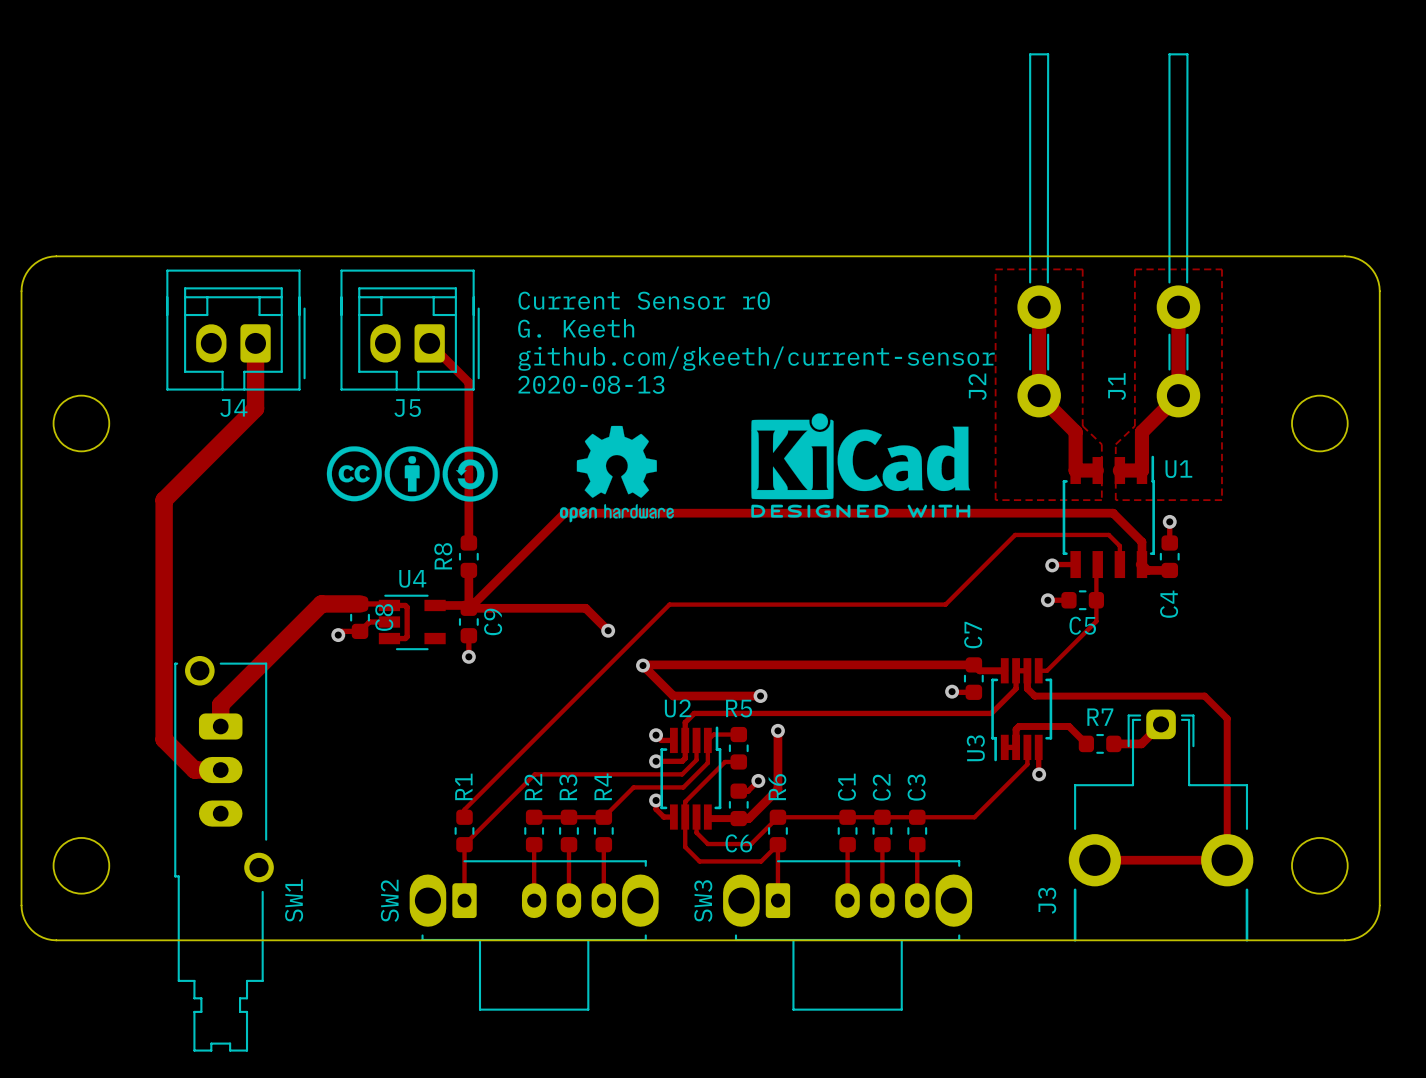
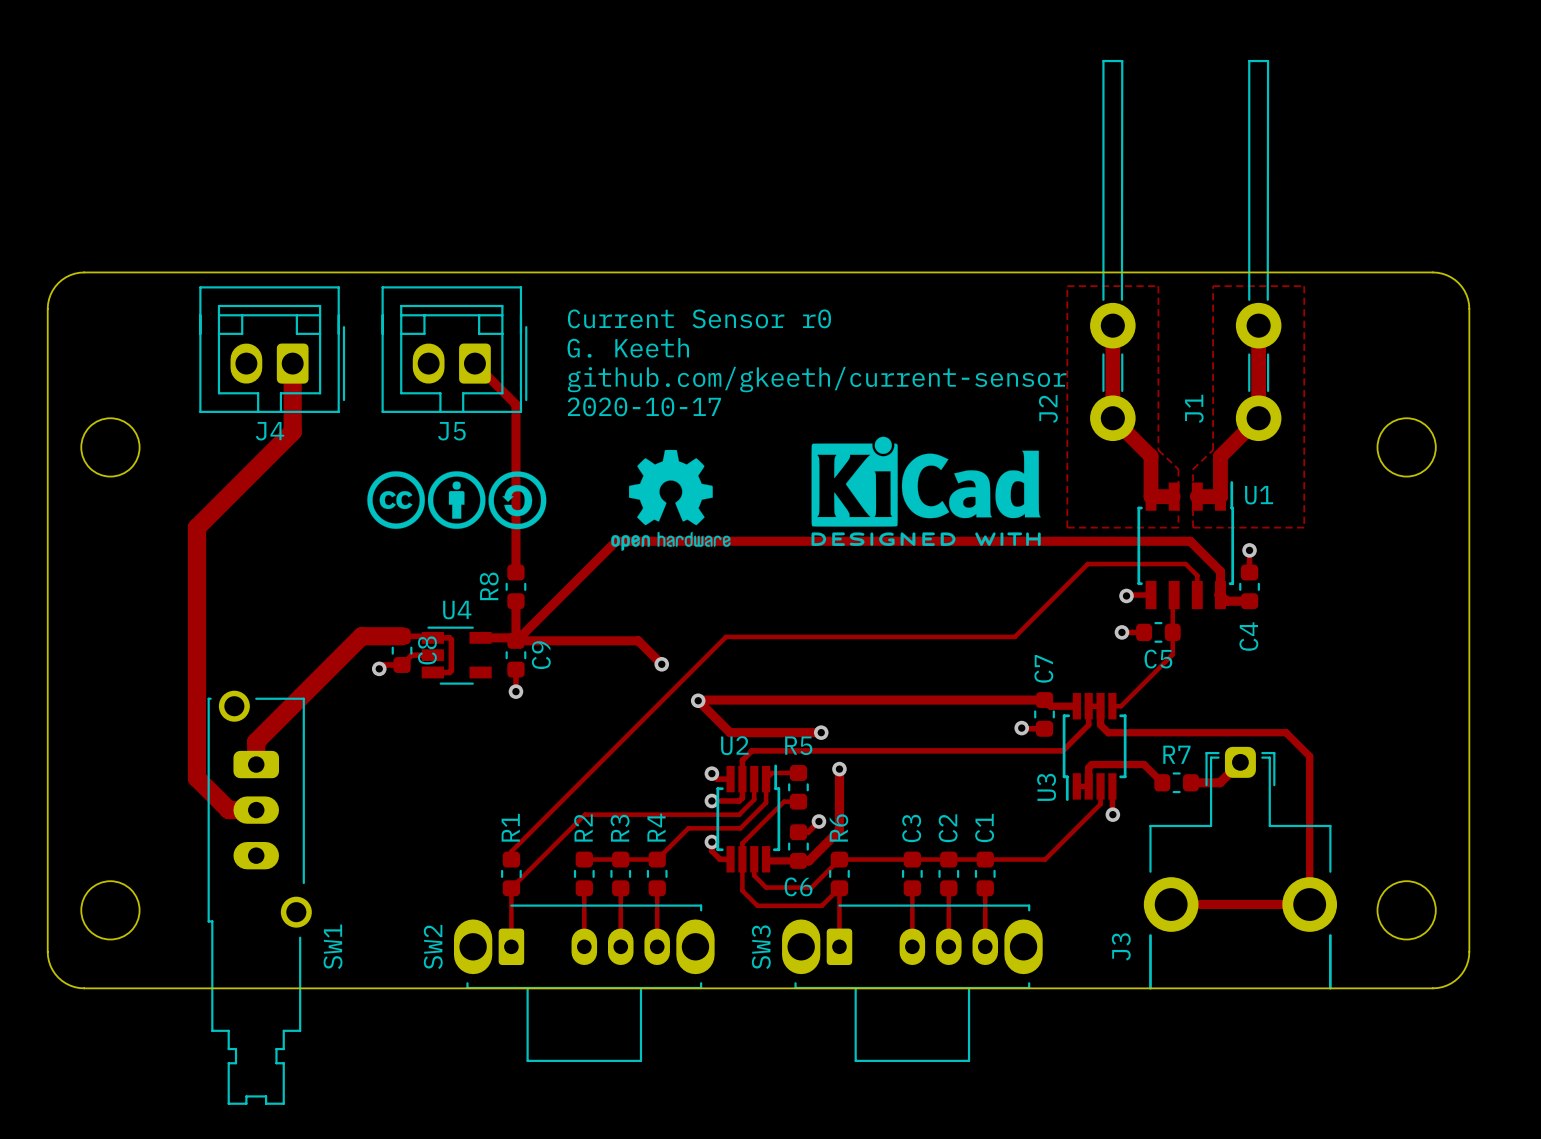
text: 2020-08-13 (591, 384) -> 2020-10-17 (644, 406)
C1 name: C1 (846, 787) -> C3 (911, 828)
C3 name: C3 (916, 787) -> C1 (984, 828)

